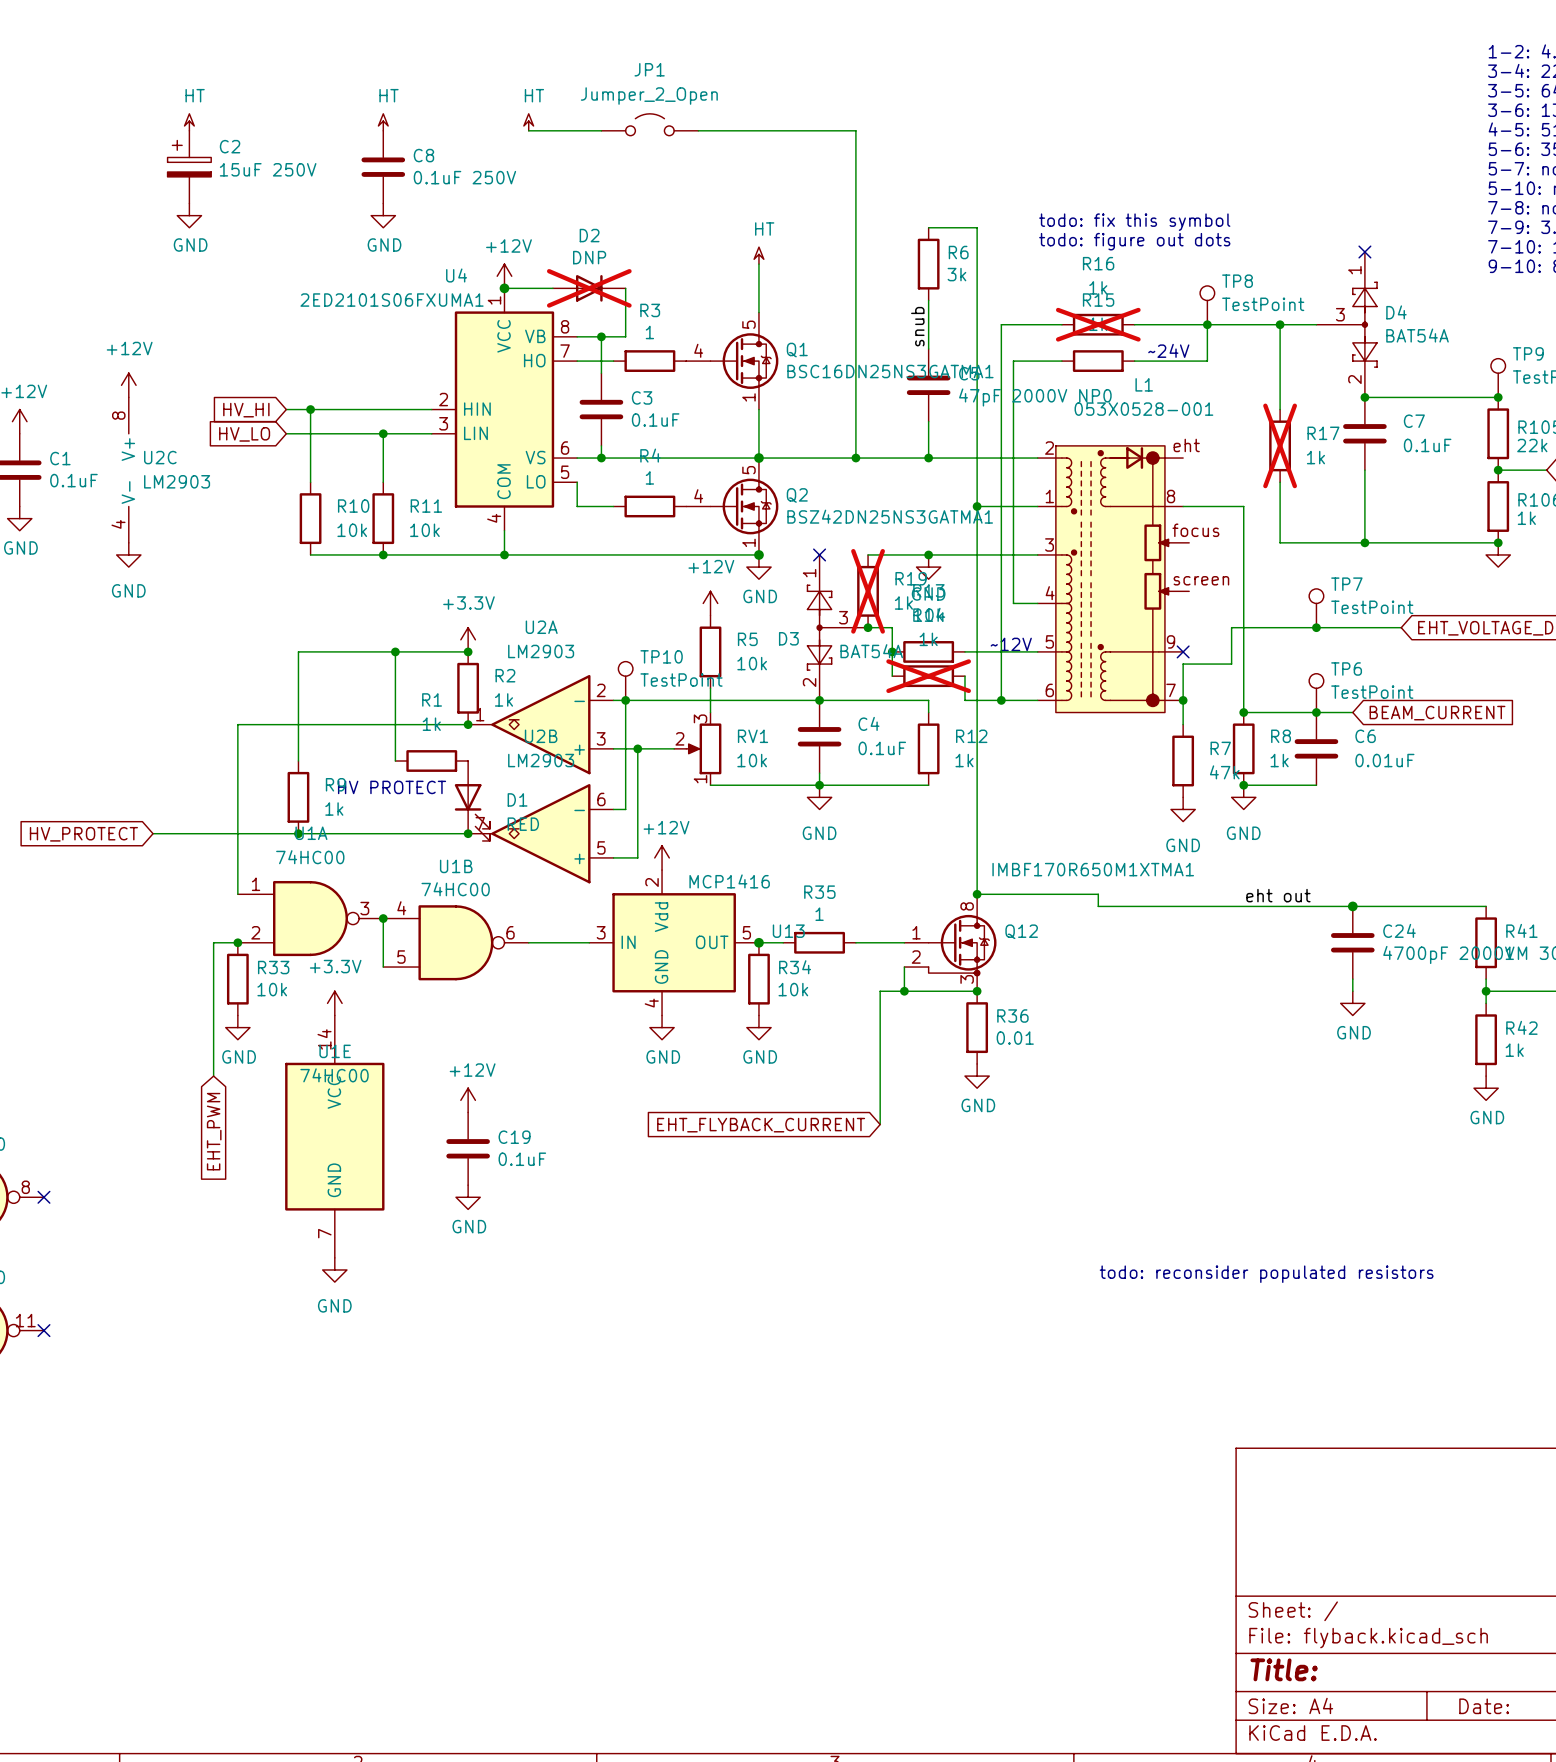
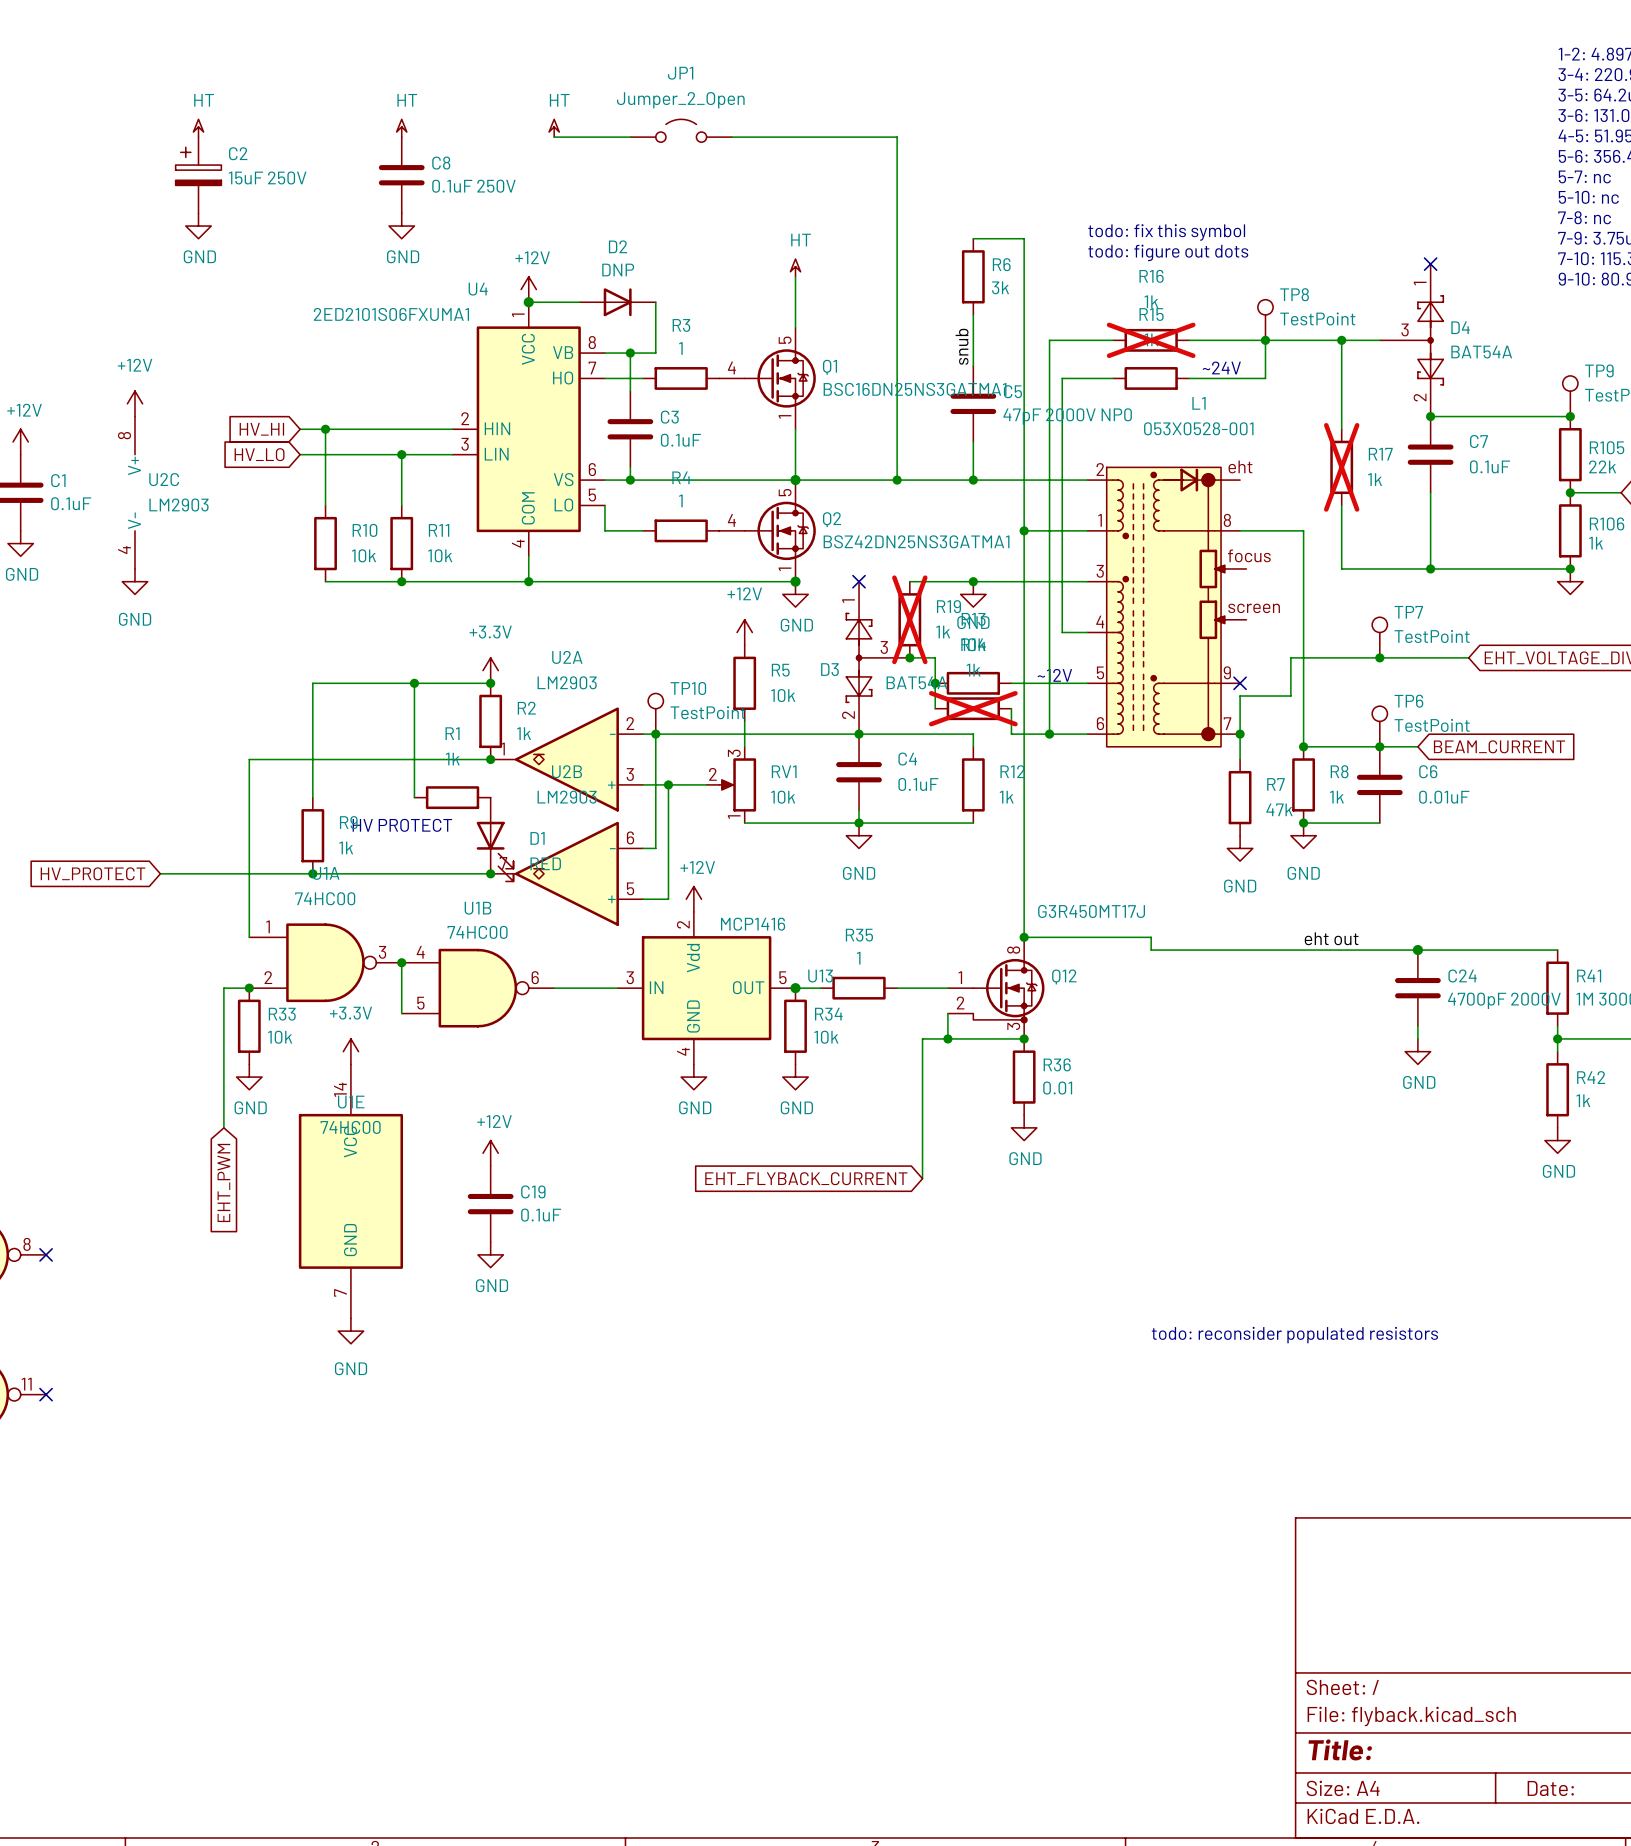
D2 do-not-place cross: (589, 288) -> none
Q12 value: IMBF170R650M1XTMA1 (1093, 869) -> G3R450MT17J (1091, 911)

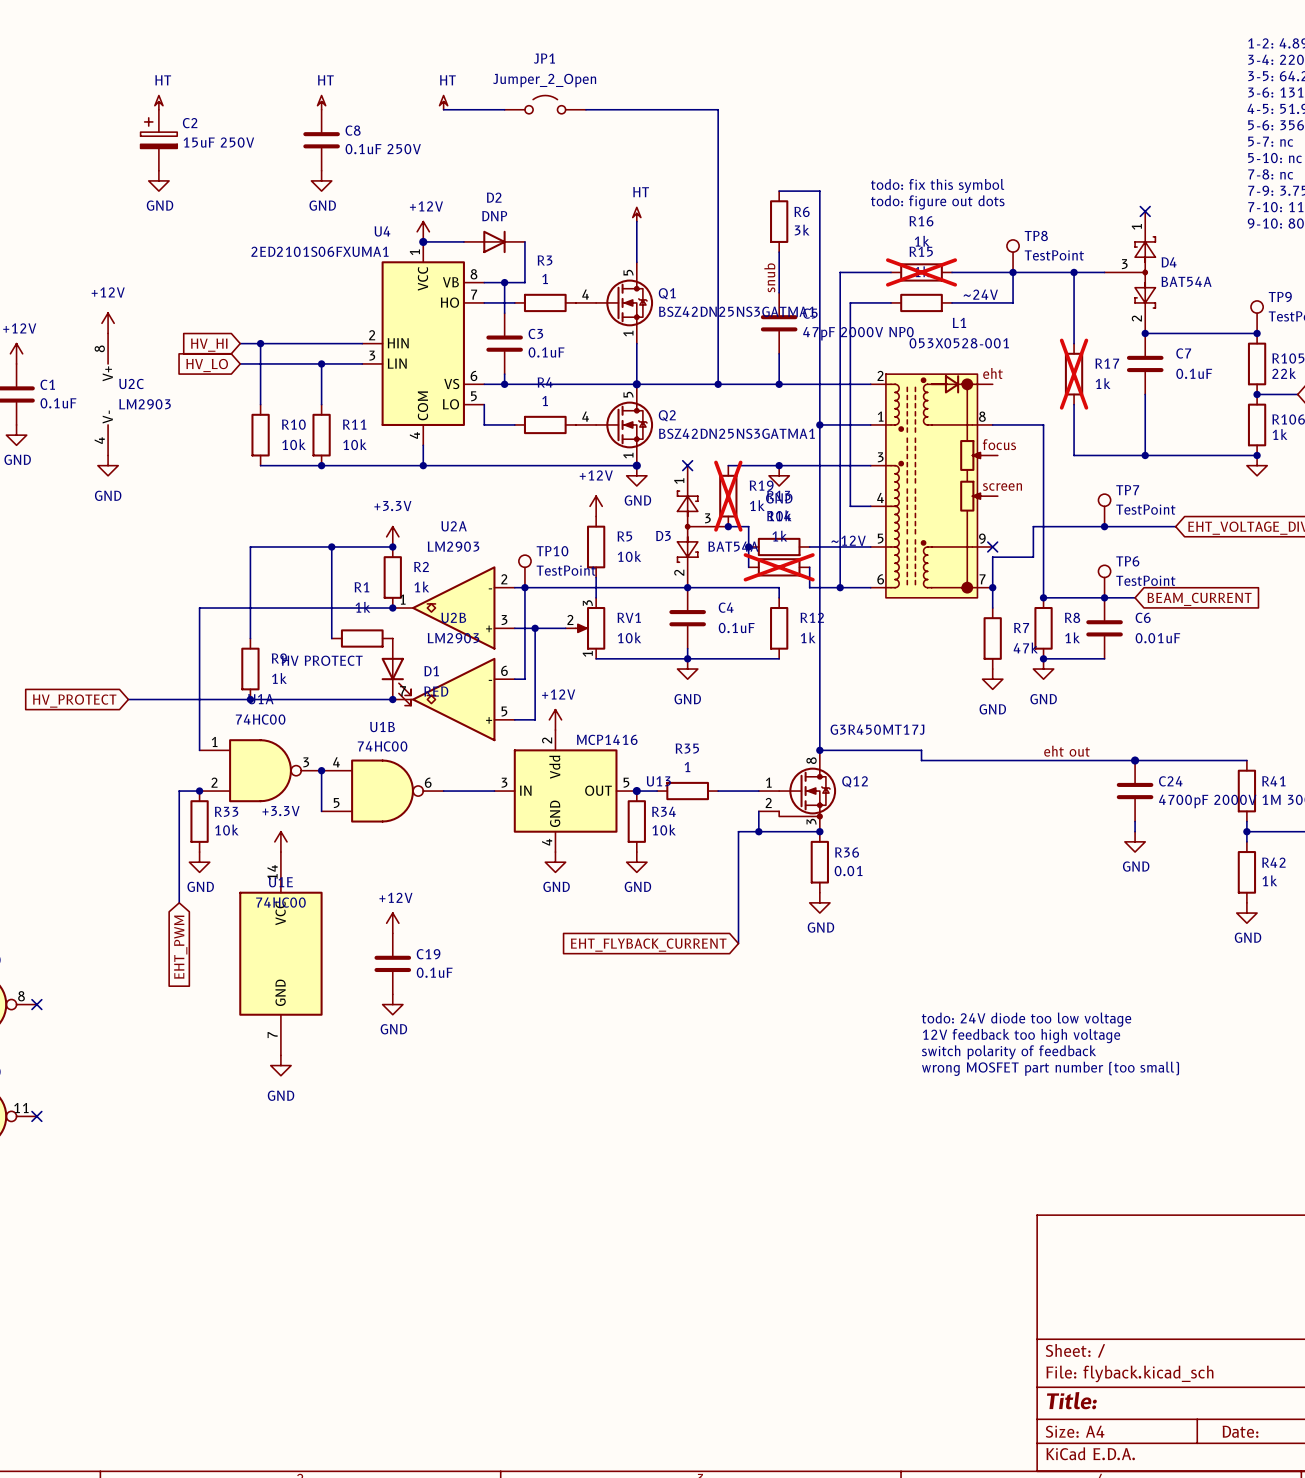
Q1 value: BSC16DN25NS3GATMA1 (915, 389) -> BSZ42DN25NS3GATMA1 (736, 311)
text: none -> todo: 24V diode too low voltage (1026, 1019)
text: none -> 12V feedback too high voltage (1021, 1036)
text: none -> switch polarity of feedback (1009, 1052)
text: todo: reconsider populated resistors (1294, 1335) -> wrong MOSFET part number (too small) (1050, 1068)

